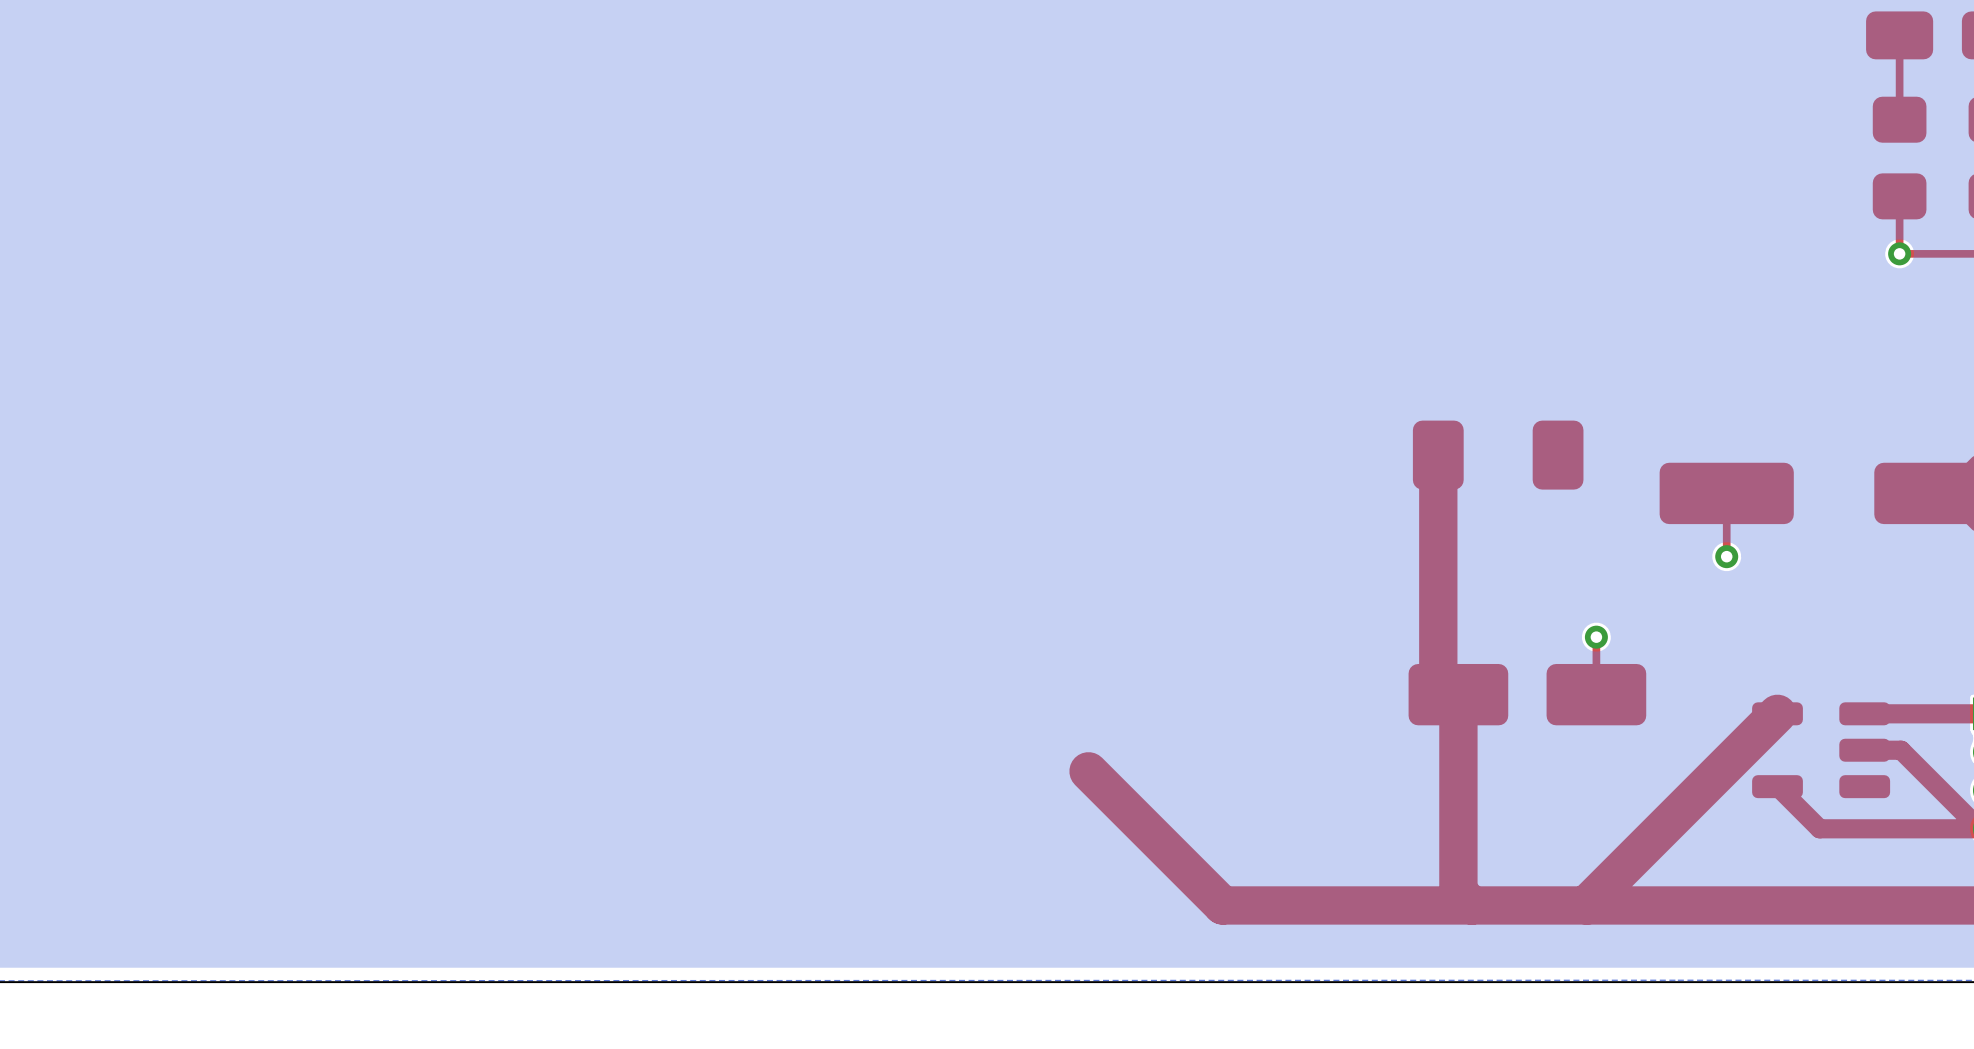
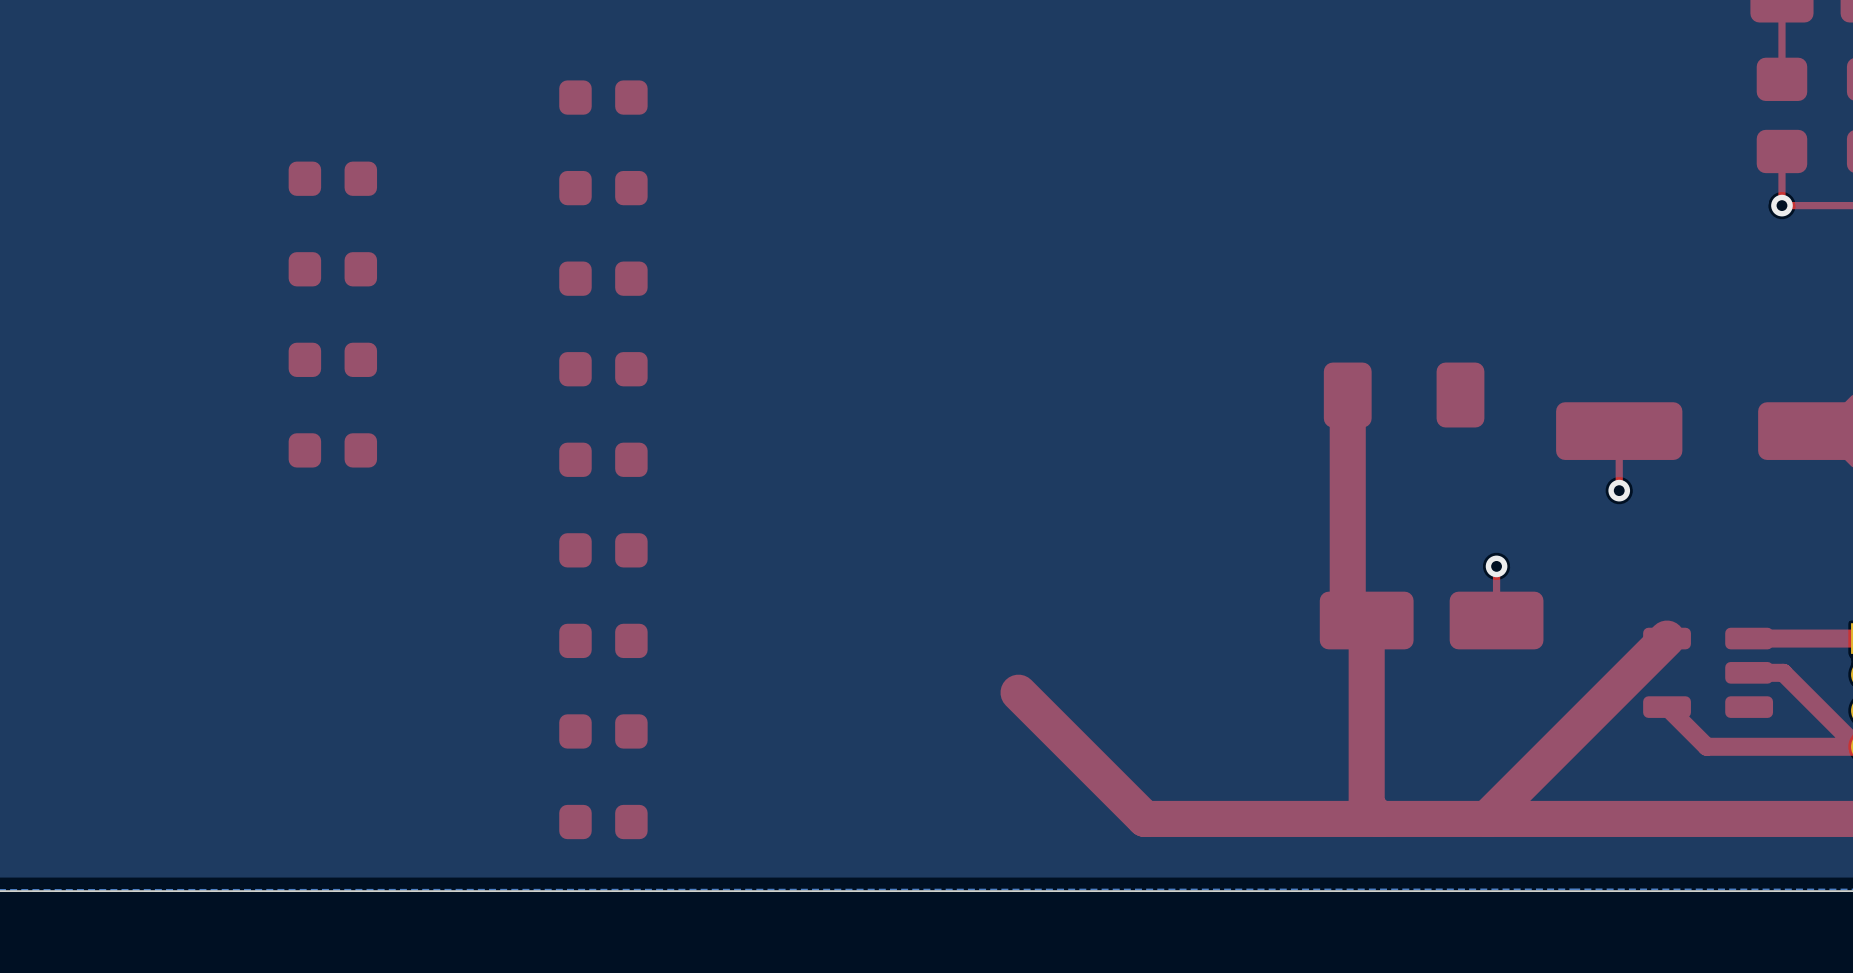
part: none -> (603, 97)
part: none -> (332, 178)
part: none -> (603, 188)
part: none -> (332, 269)
part: none -> (603, 278)
part: none -> (332, 359)
part: none -> (603, 369)
part: none -> (332, 450)
part: none -> (603, 459)
part: none -> (603, 550)
part: none -> (603, 640)
part: none -> (603, 731)
part: none -> (603, 822)

